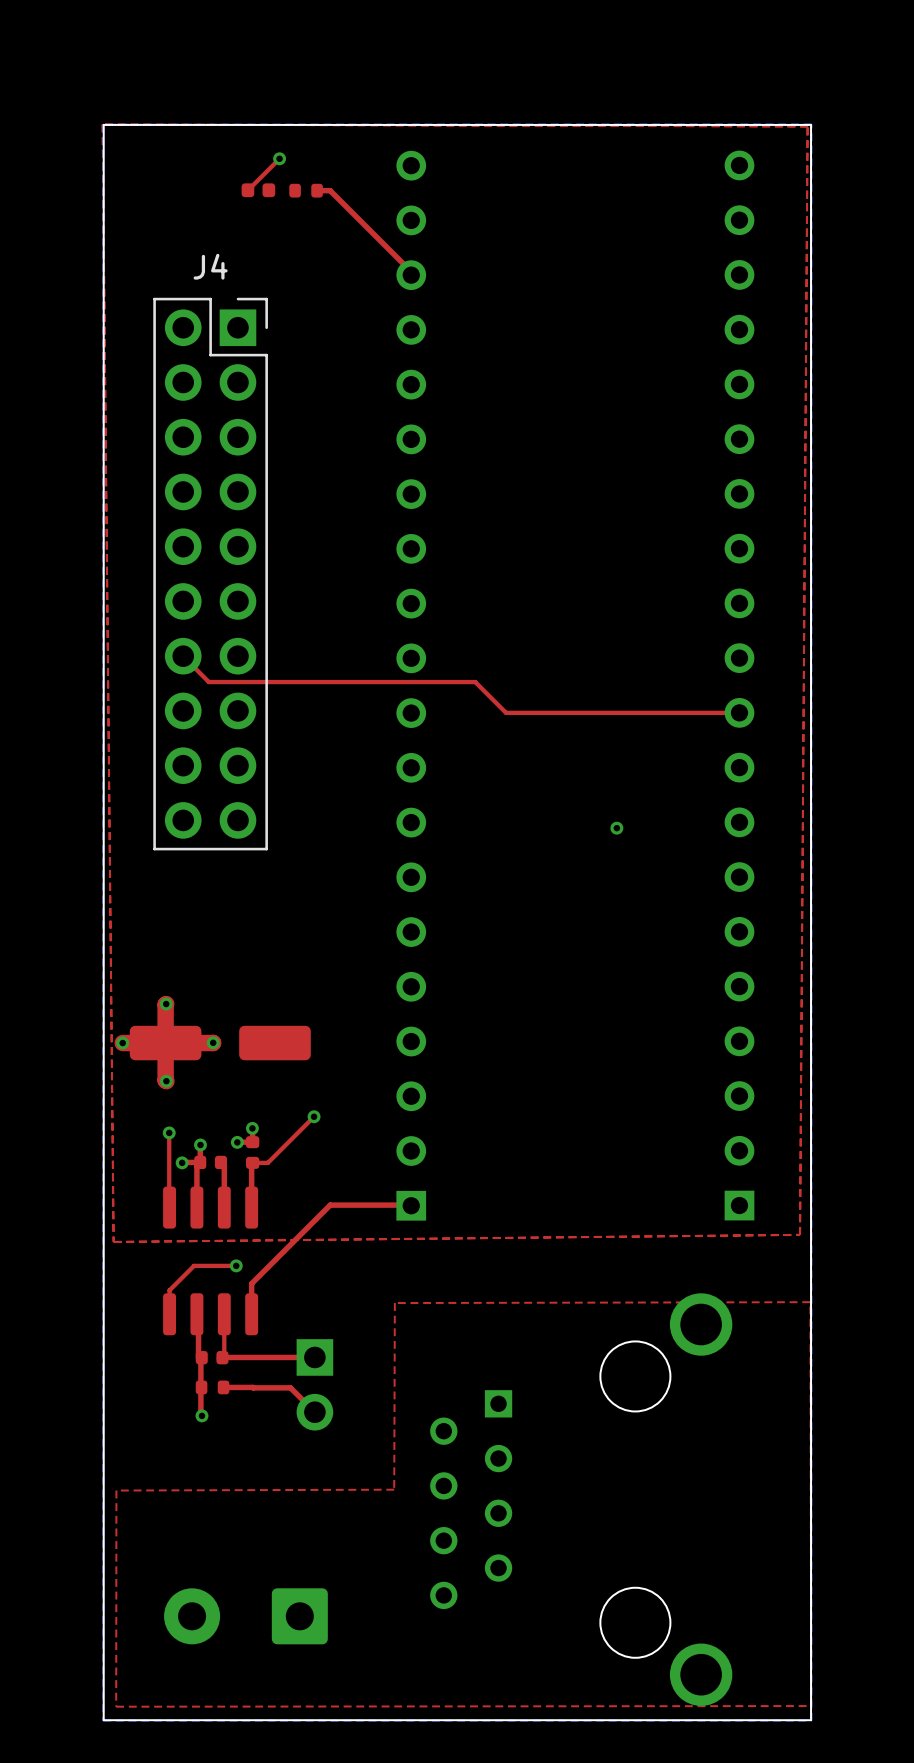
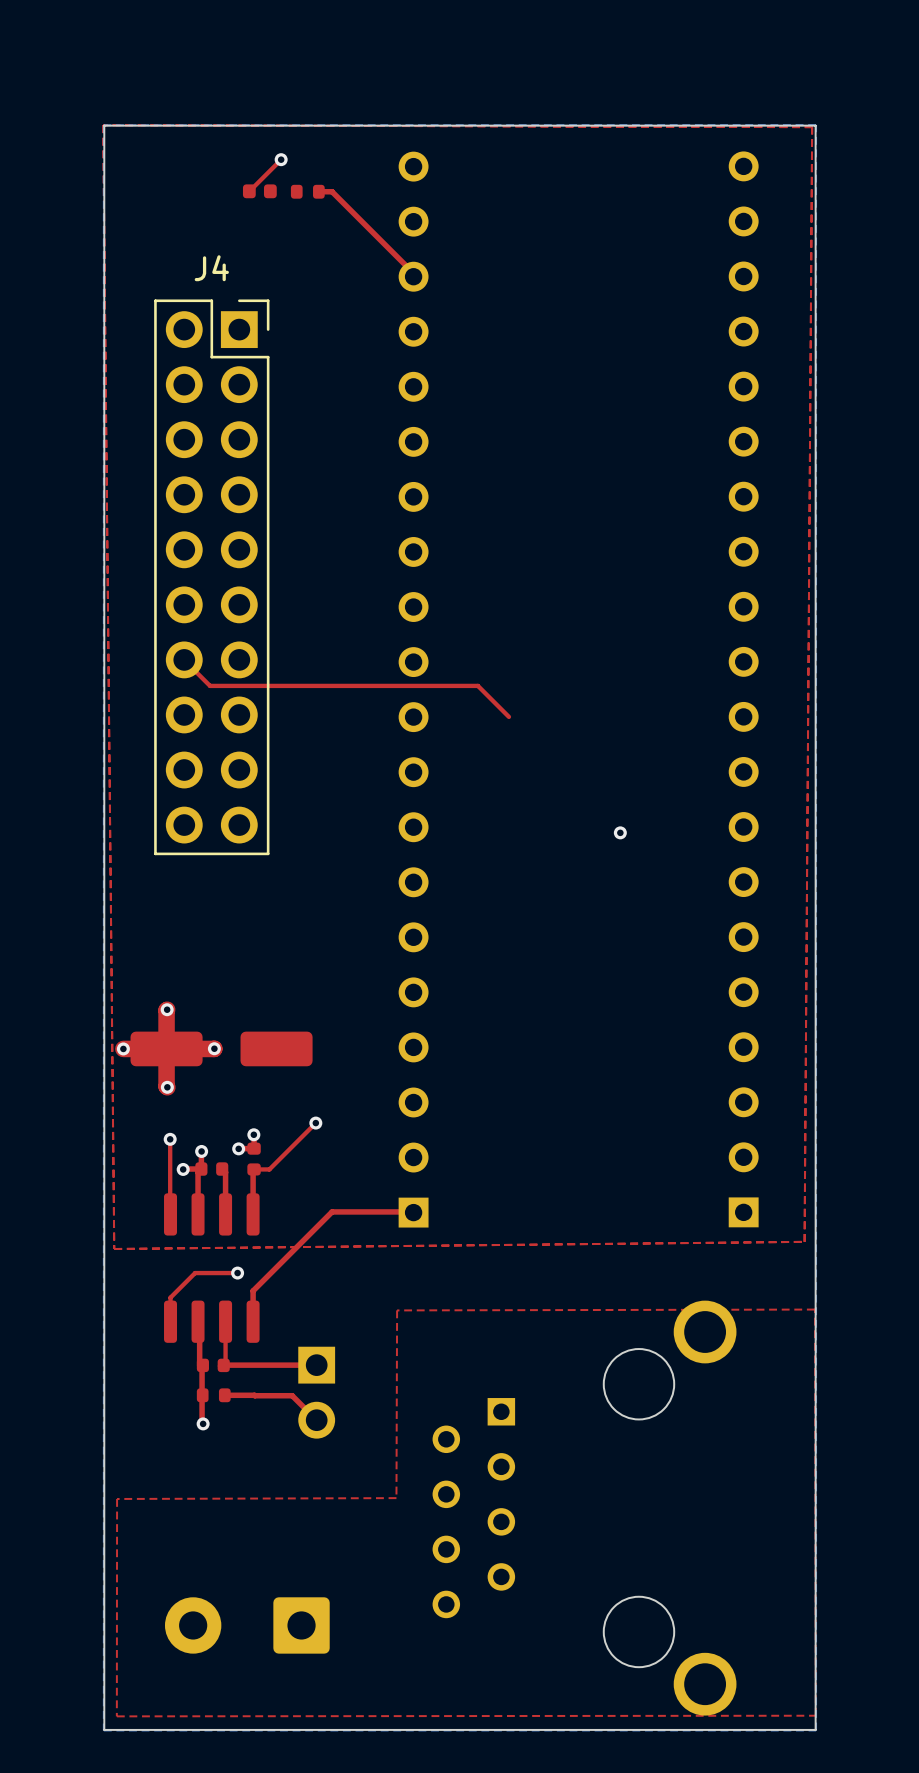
top track: (739, 712) (506, 712) -> none

